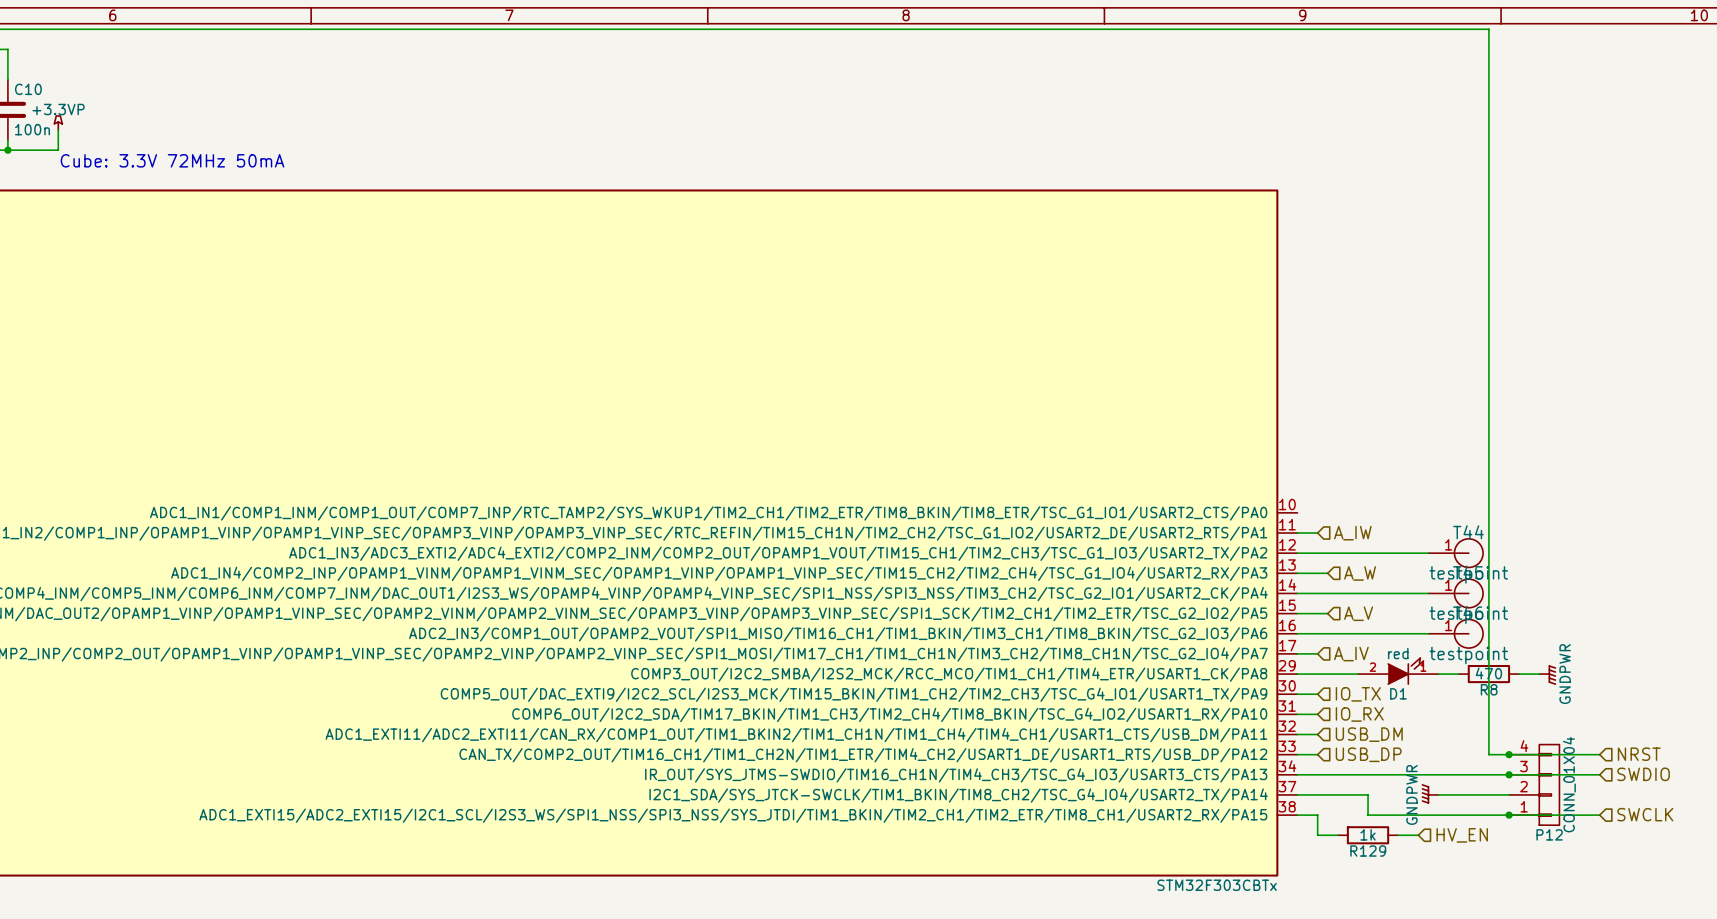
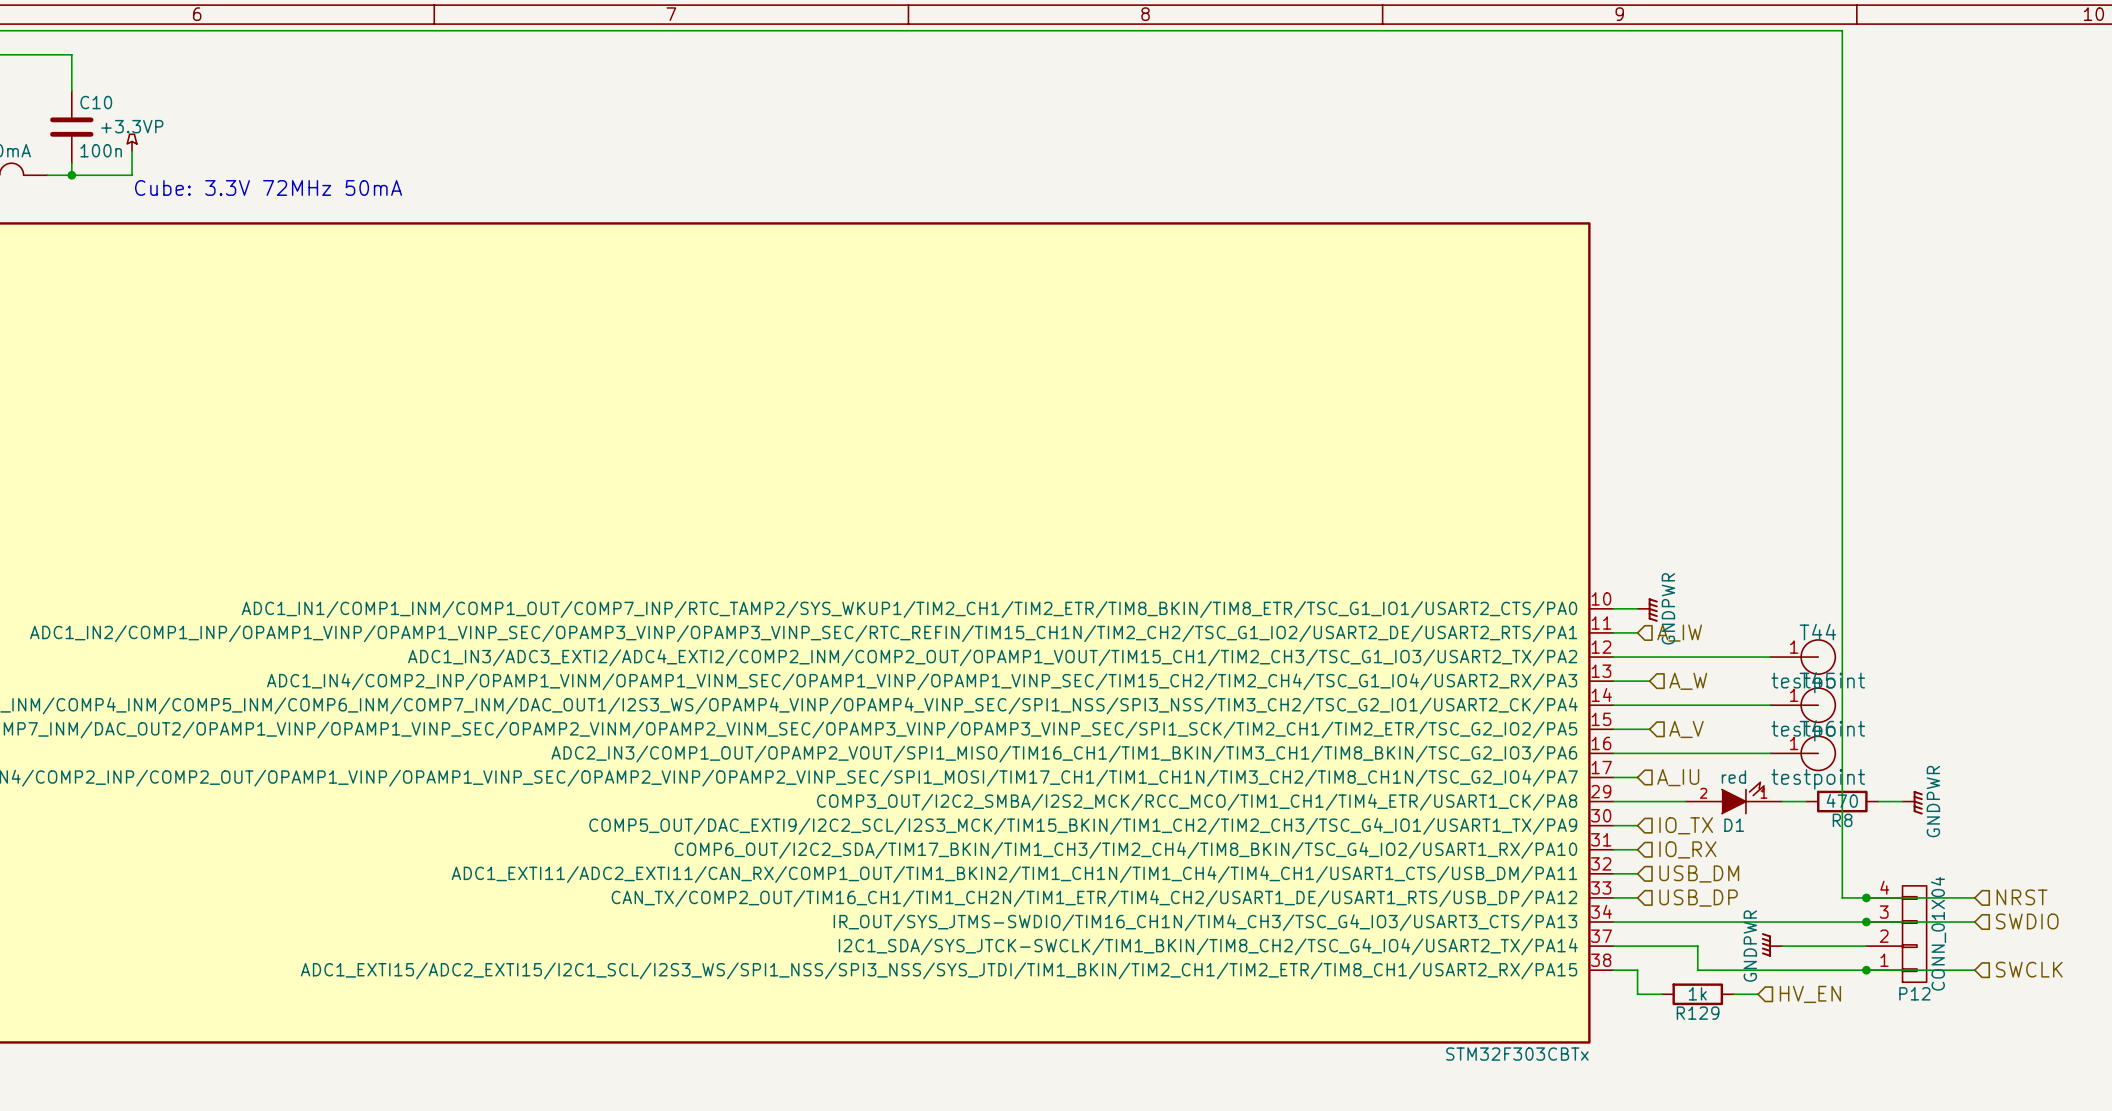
wire: none -> (1613, 608) (1637, 608)
power symbol: none -> GNDPWR (1647, 610)
hierarchical label: A_IV (1351, 654) -> A_IU (1678, 777)

